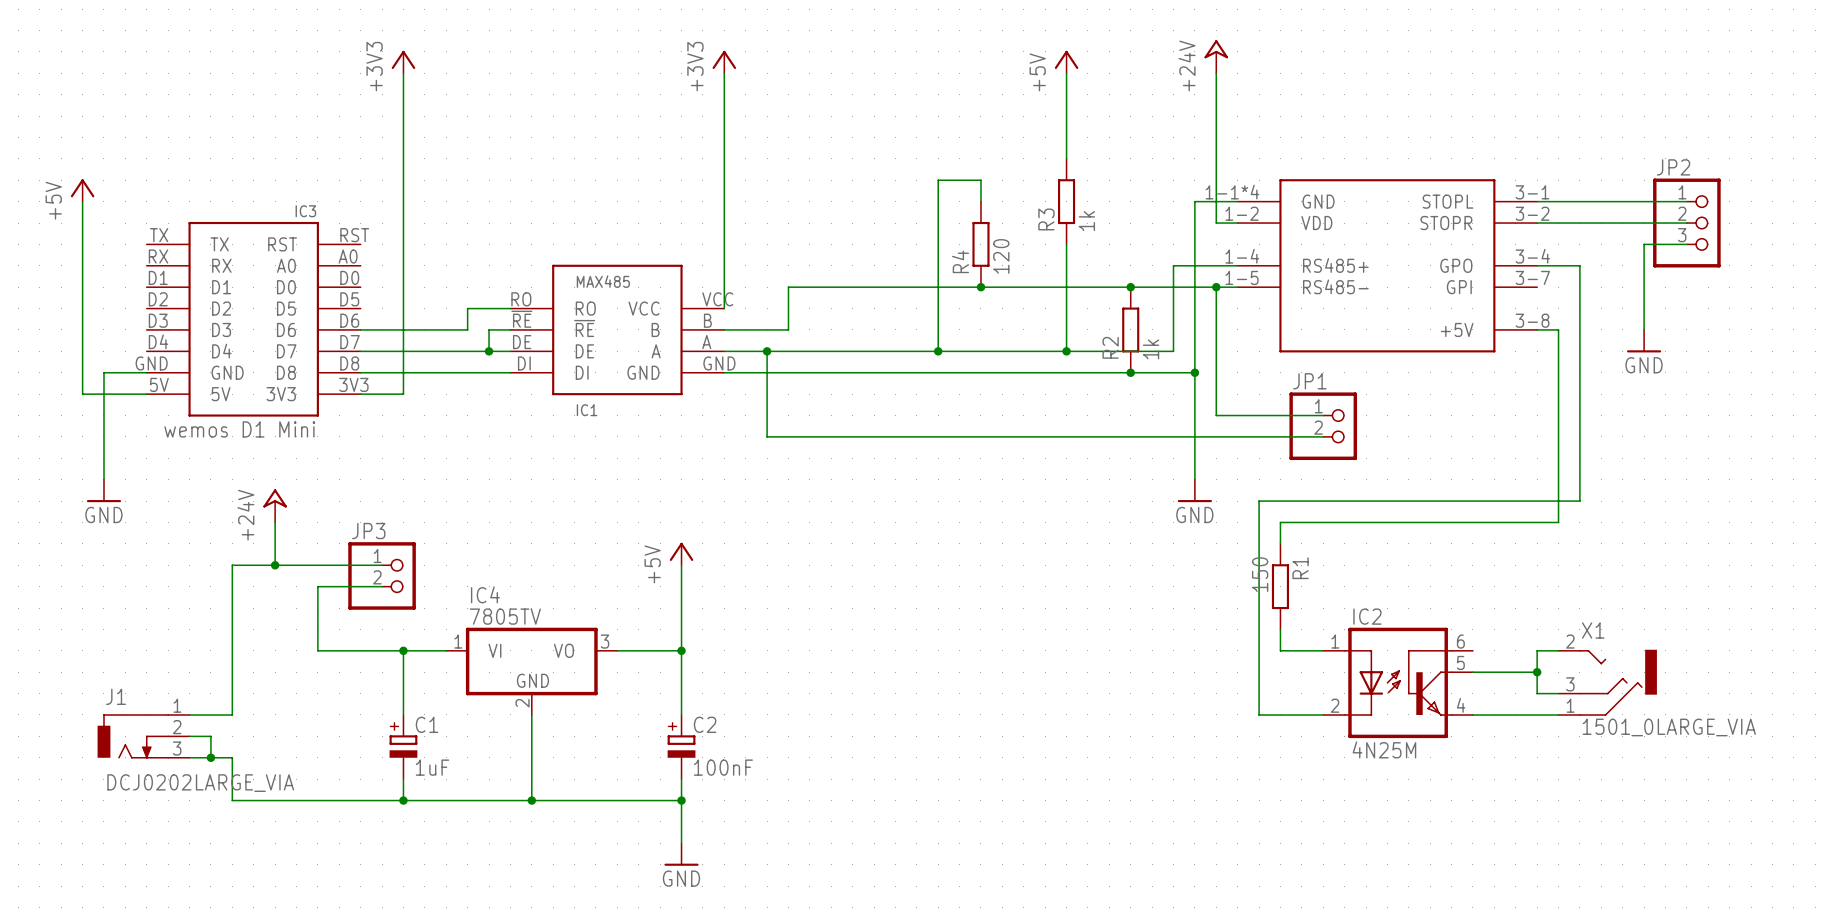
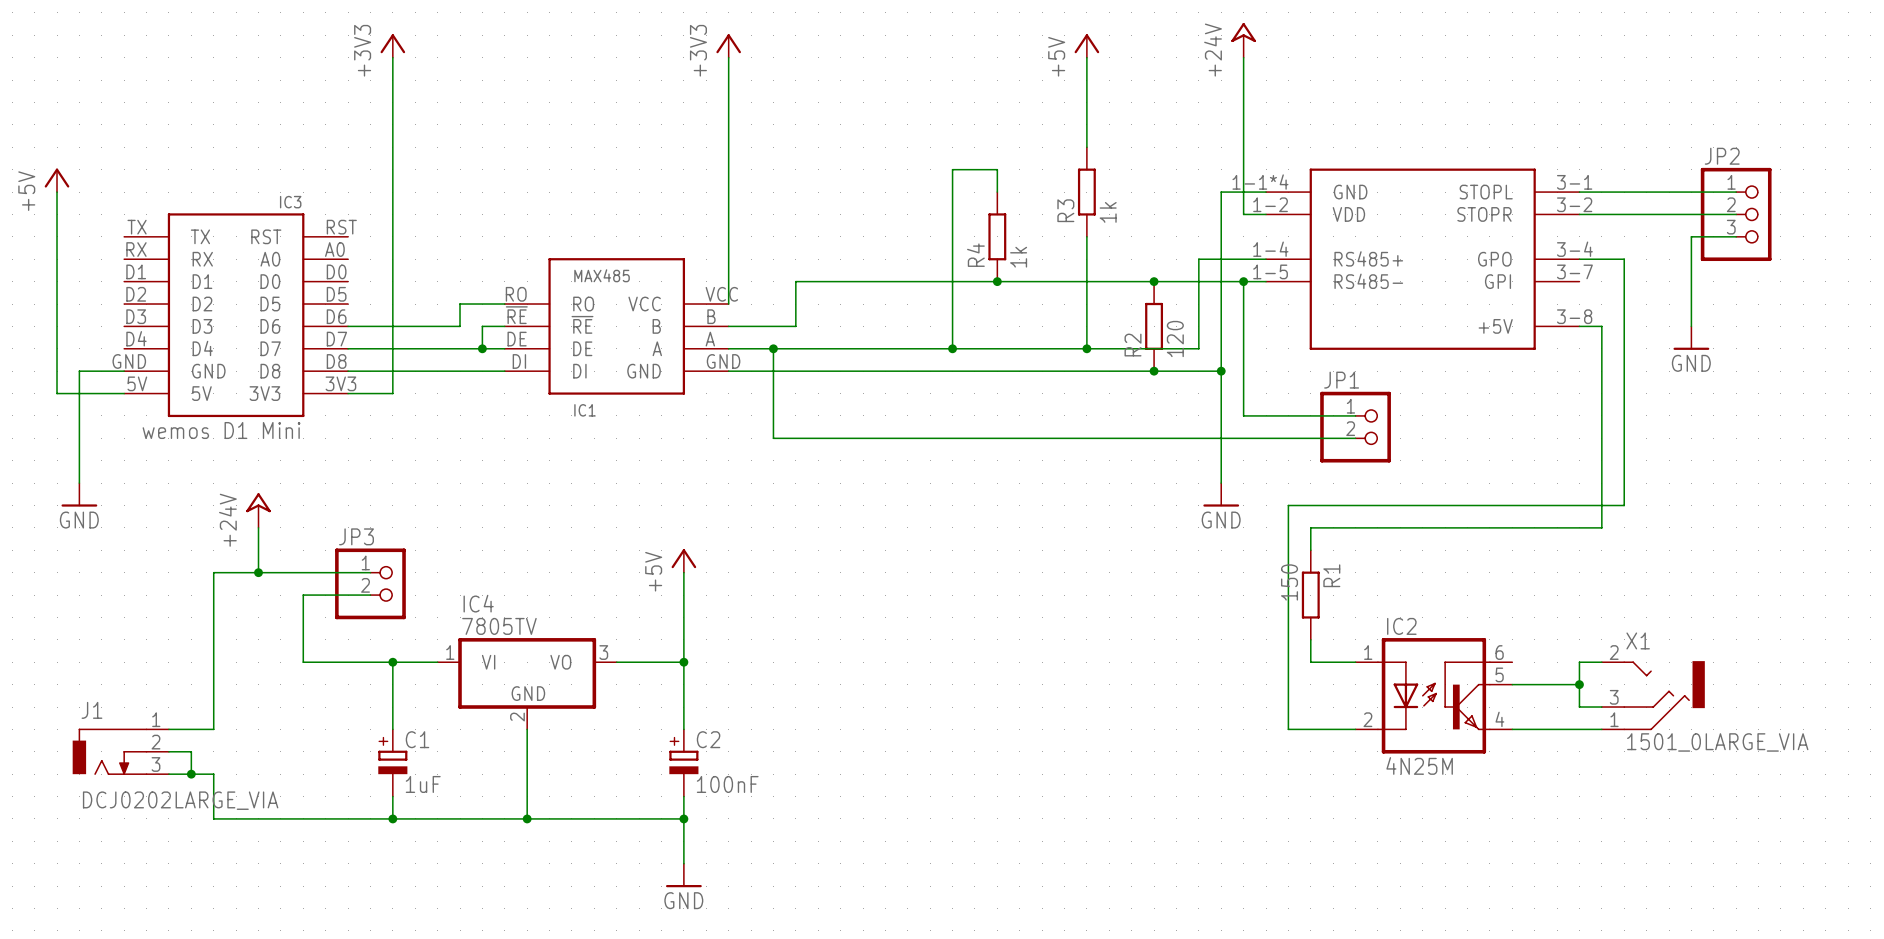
R4 value: 120 (1001, 256) -> 1k (1018, 257)
R2 value: 1k (1151, 349) -> 120 (1175, 339)

